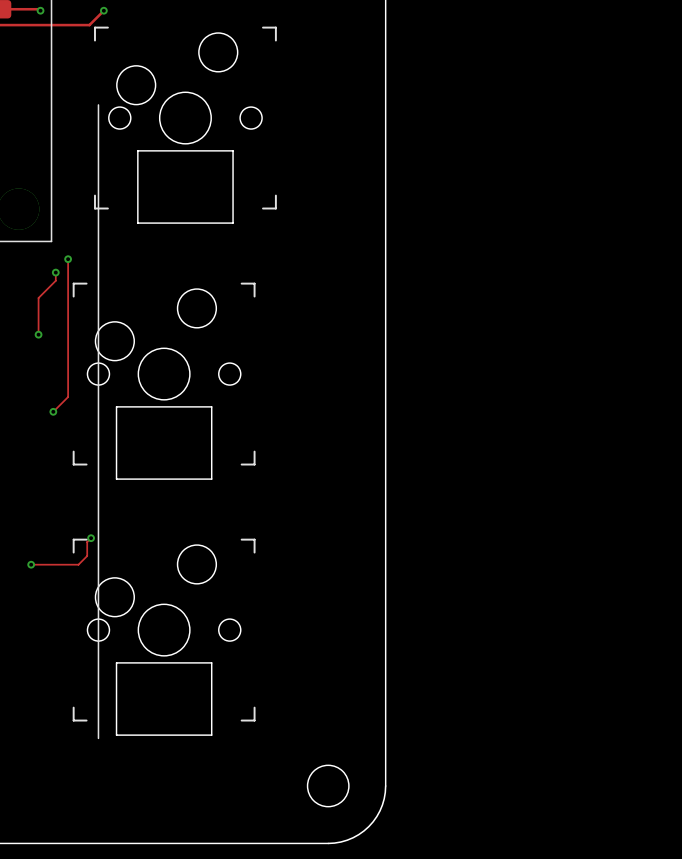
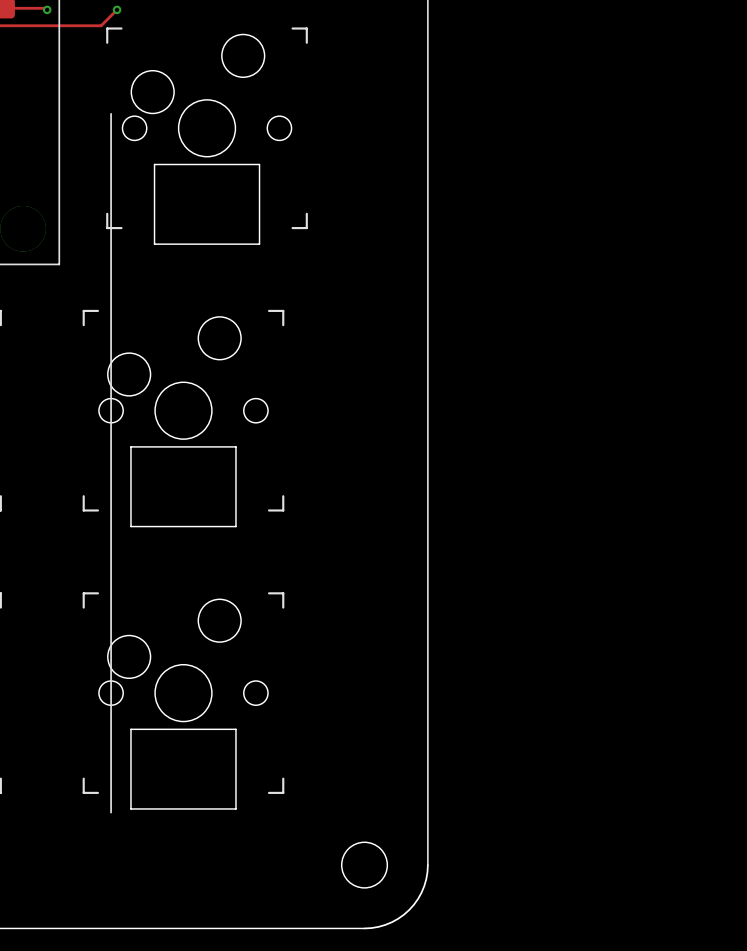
track: (68, 259) (68, 397) (53, 411) -> none
via: (68, 259) -> none
track: (55, 272) (55, 280) (38, 298) (38, 334) -> none
via: (55, 272) -> none
via: (38, 334) -> none
via: (53, 411) -> none
track: (91, 538) (87, 542) (87, 556) (78, 564) (31, 564) -> none
via: (91, 538) -> none
via: (31, 564) -> none

